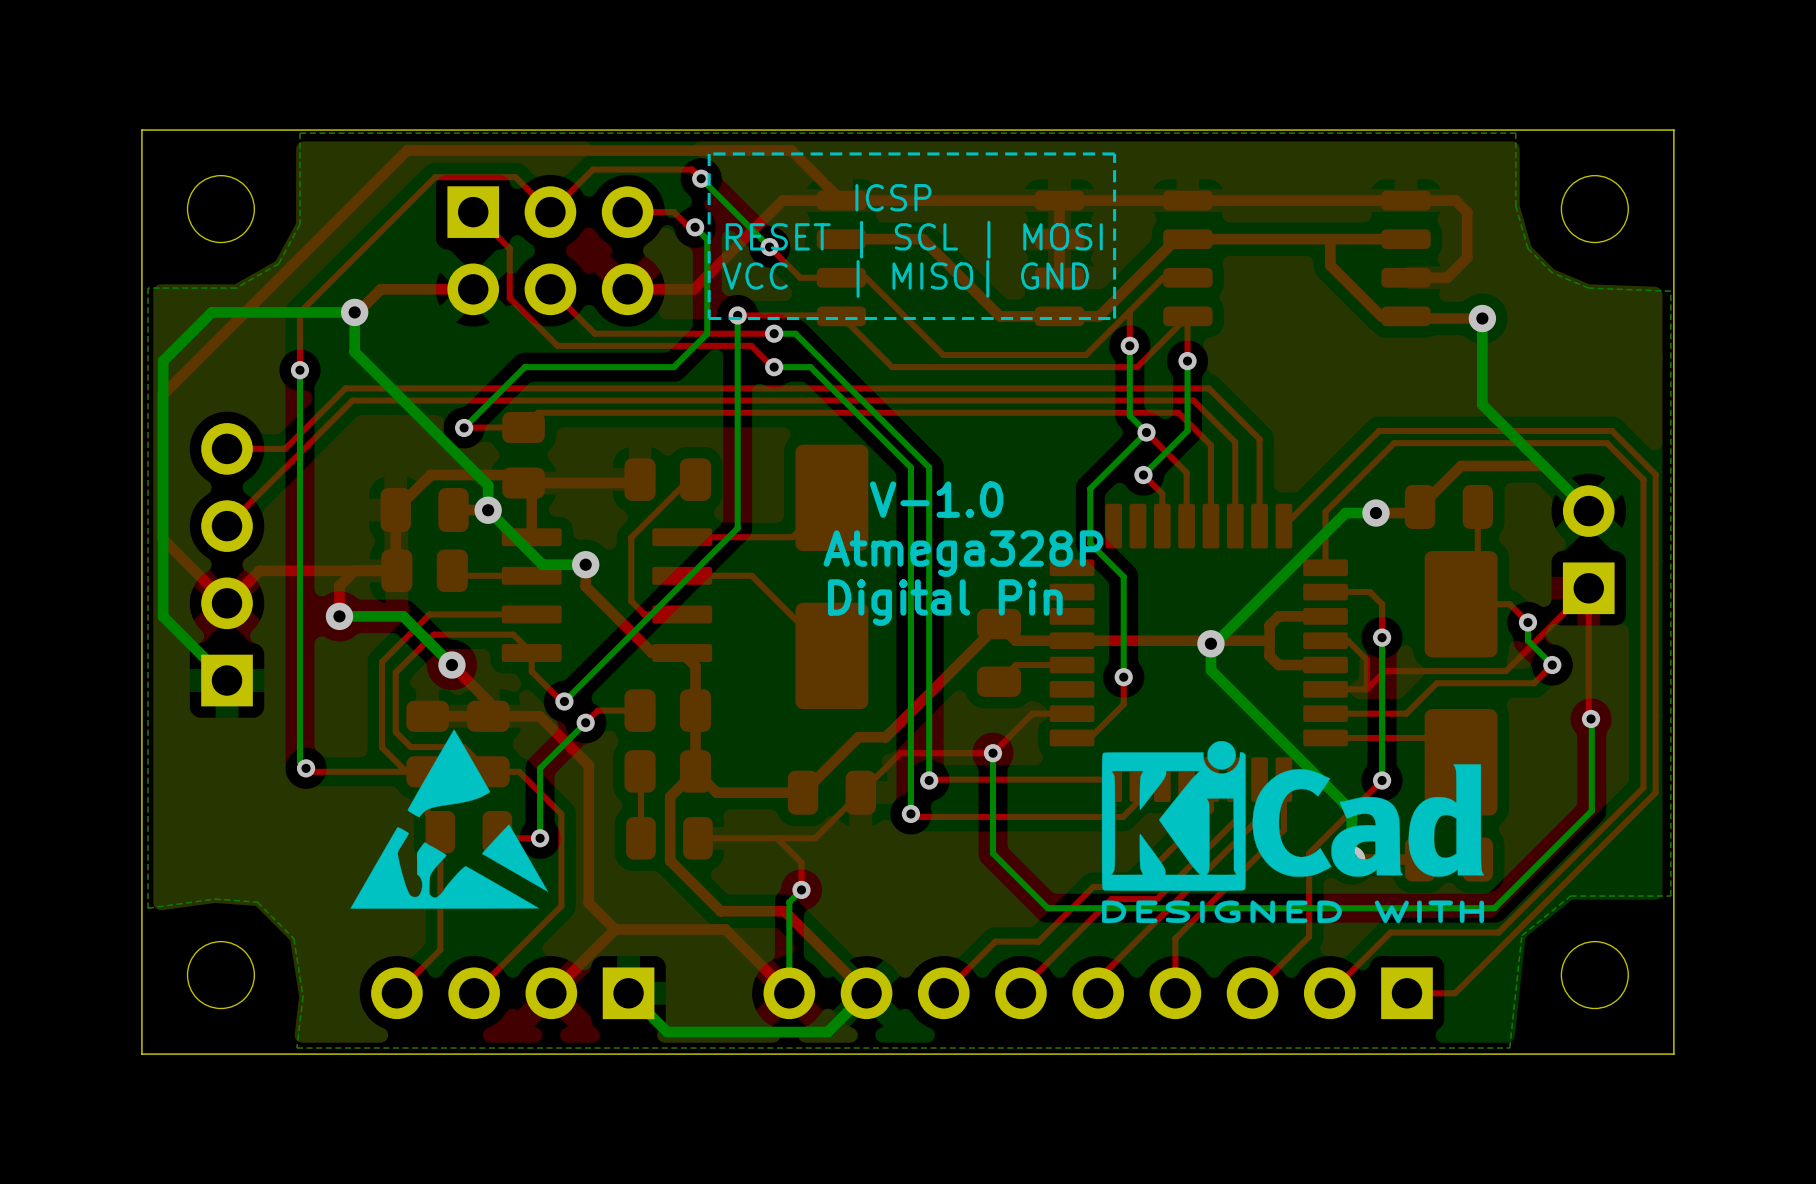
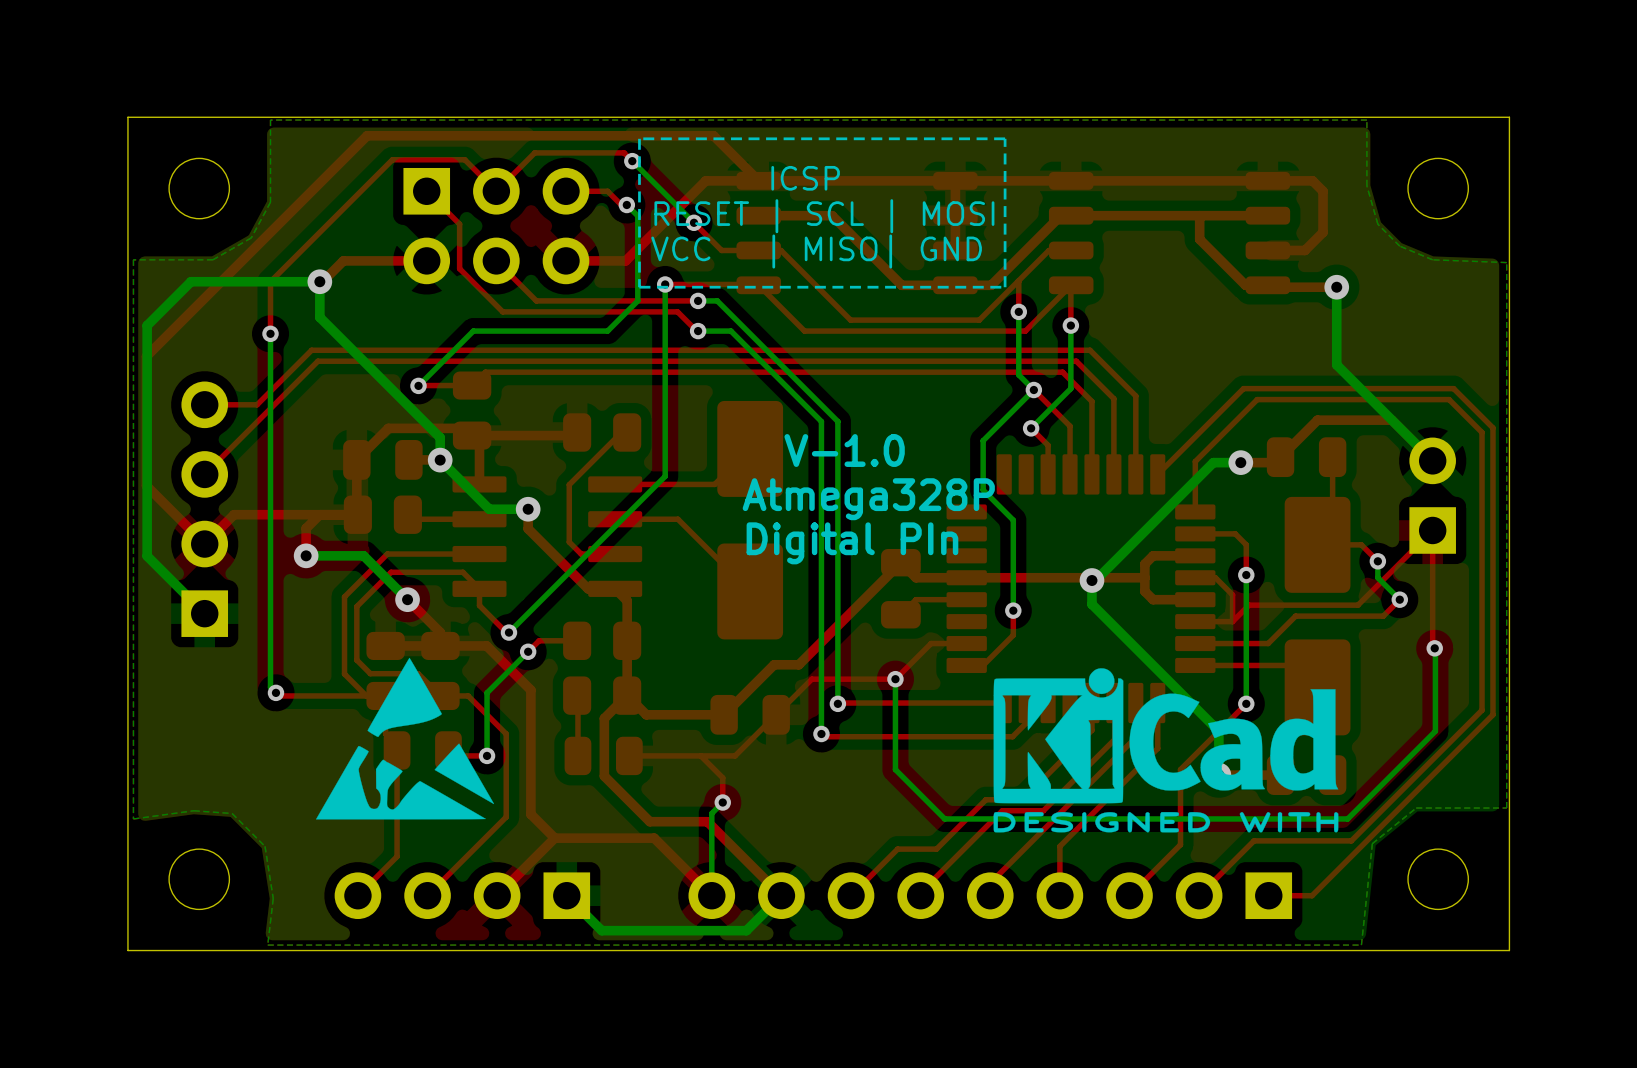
text: Digital Pin (945, 602) -> Digital PIn (852, 543)

